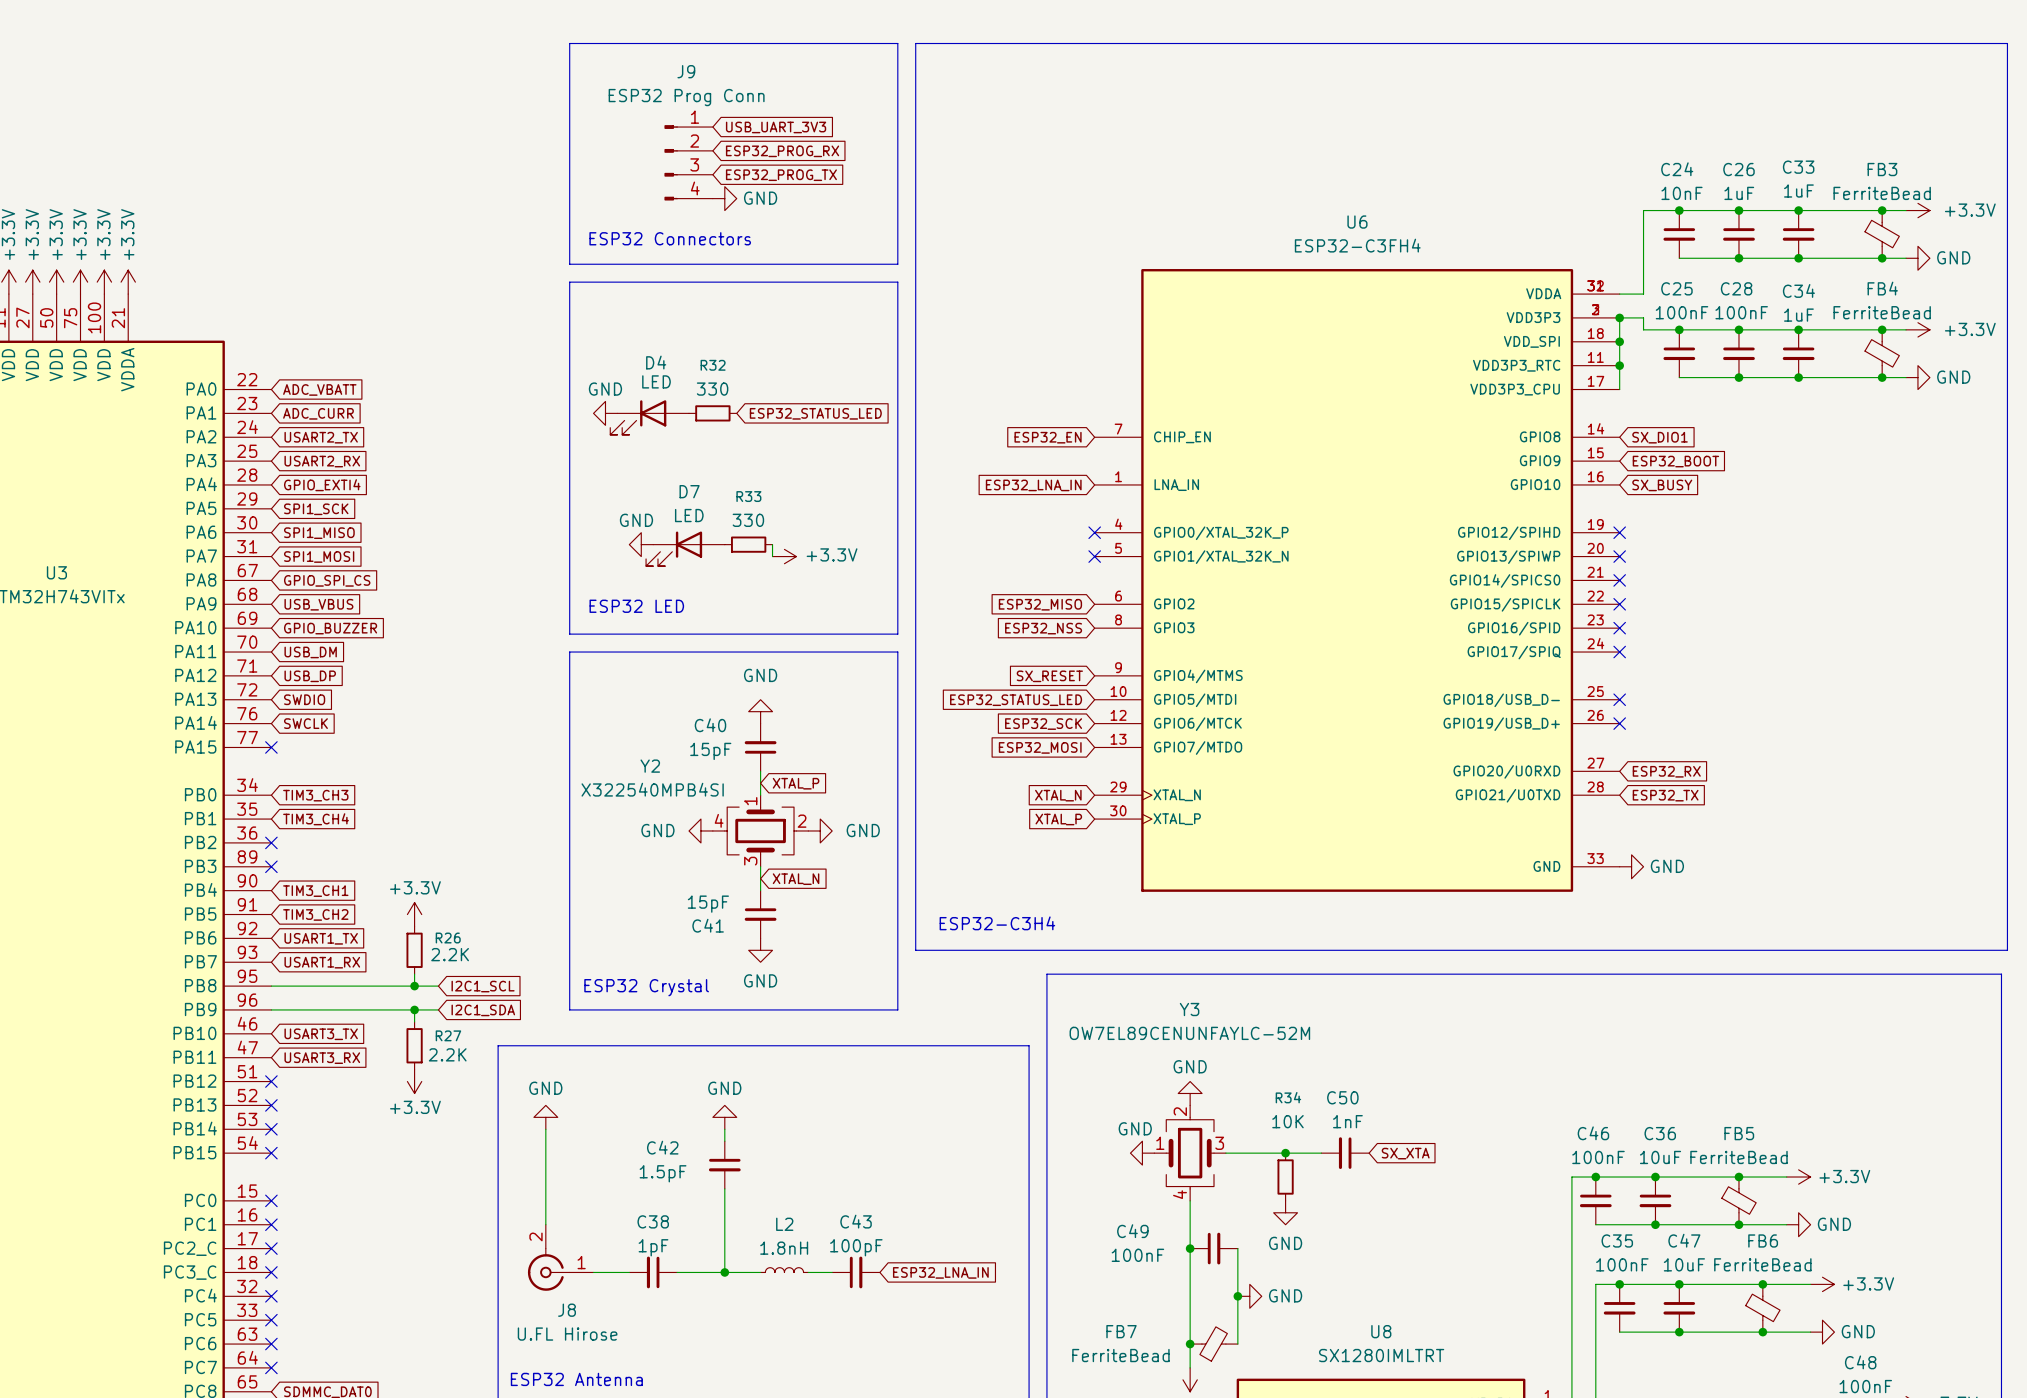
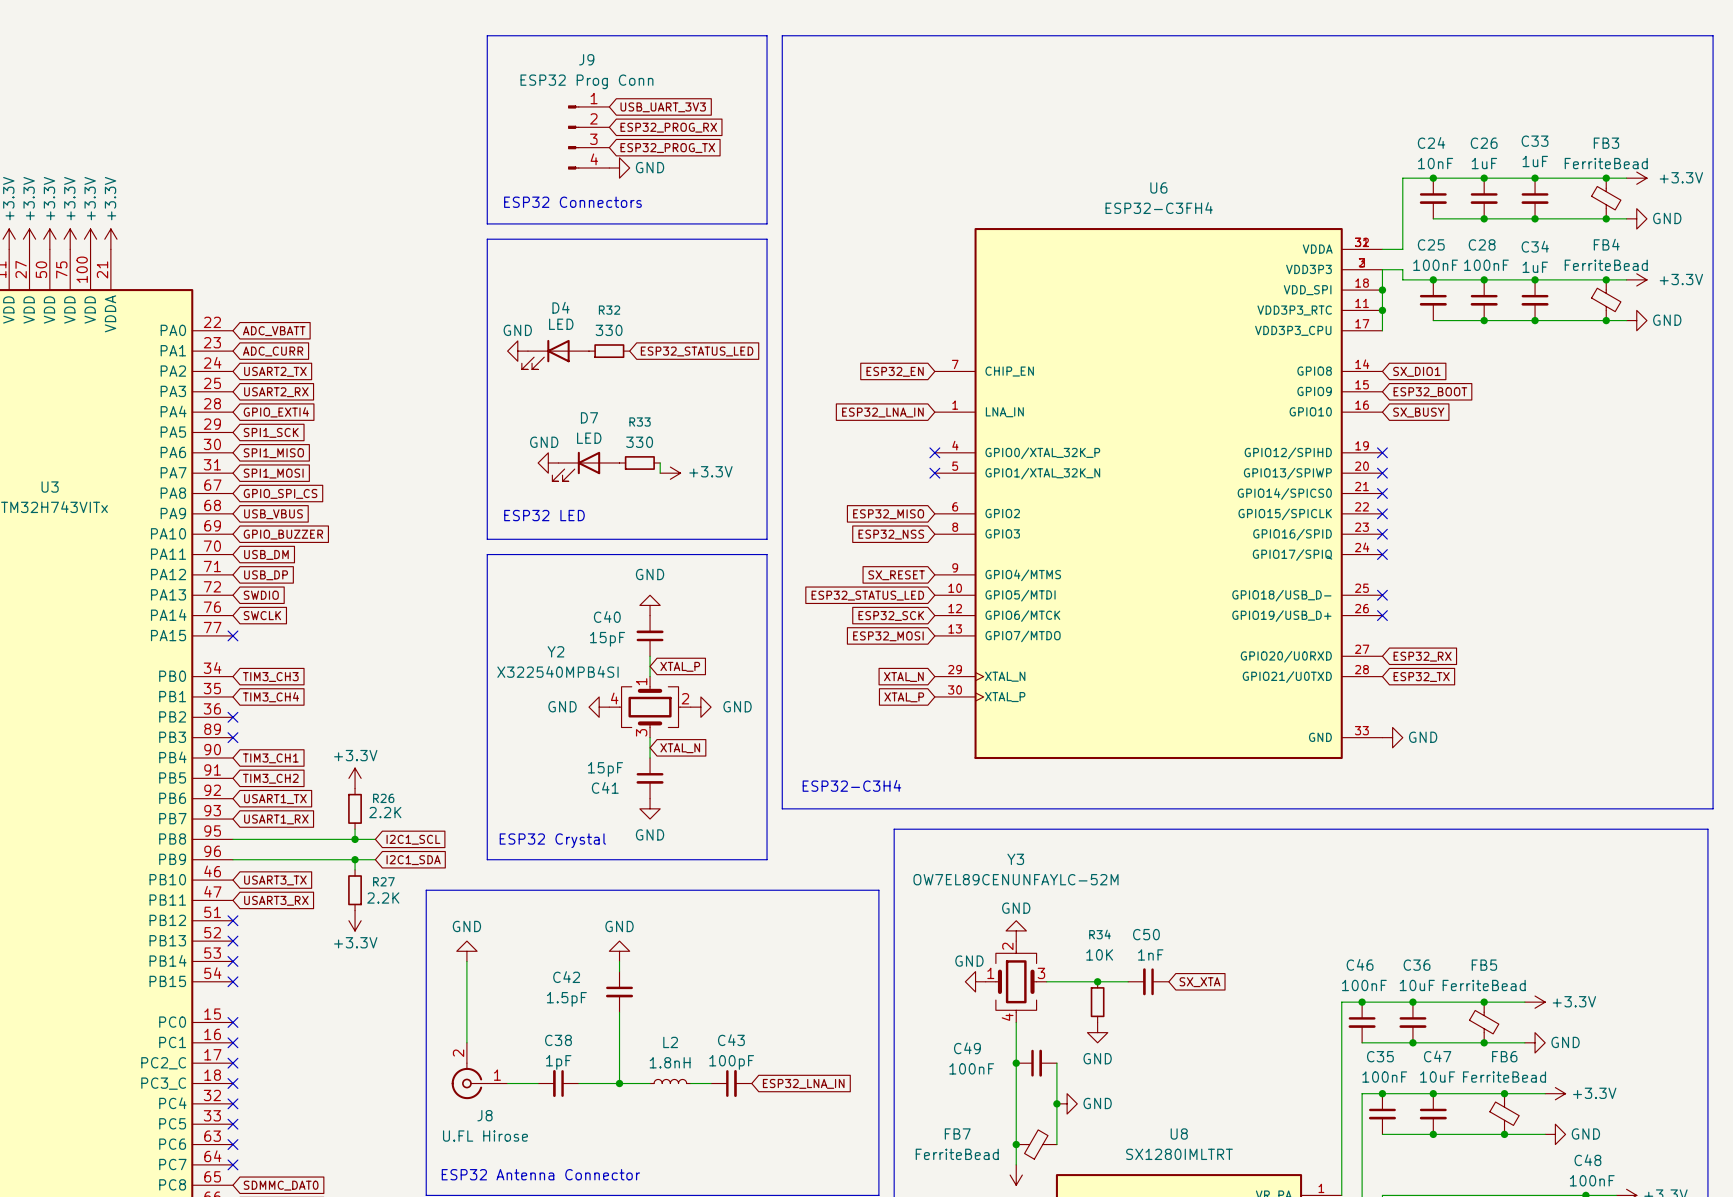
junction: (1619, 317) -> none
text: ESP32 Antenna (576, 1379) -> ESP32 Antenna Connector (540, 1174)

